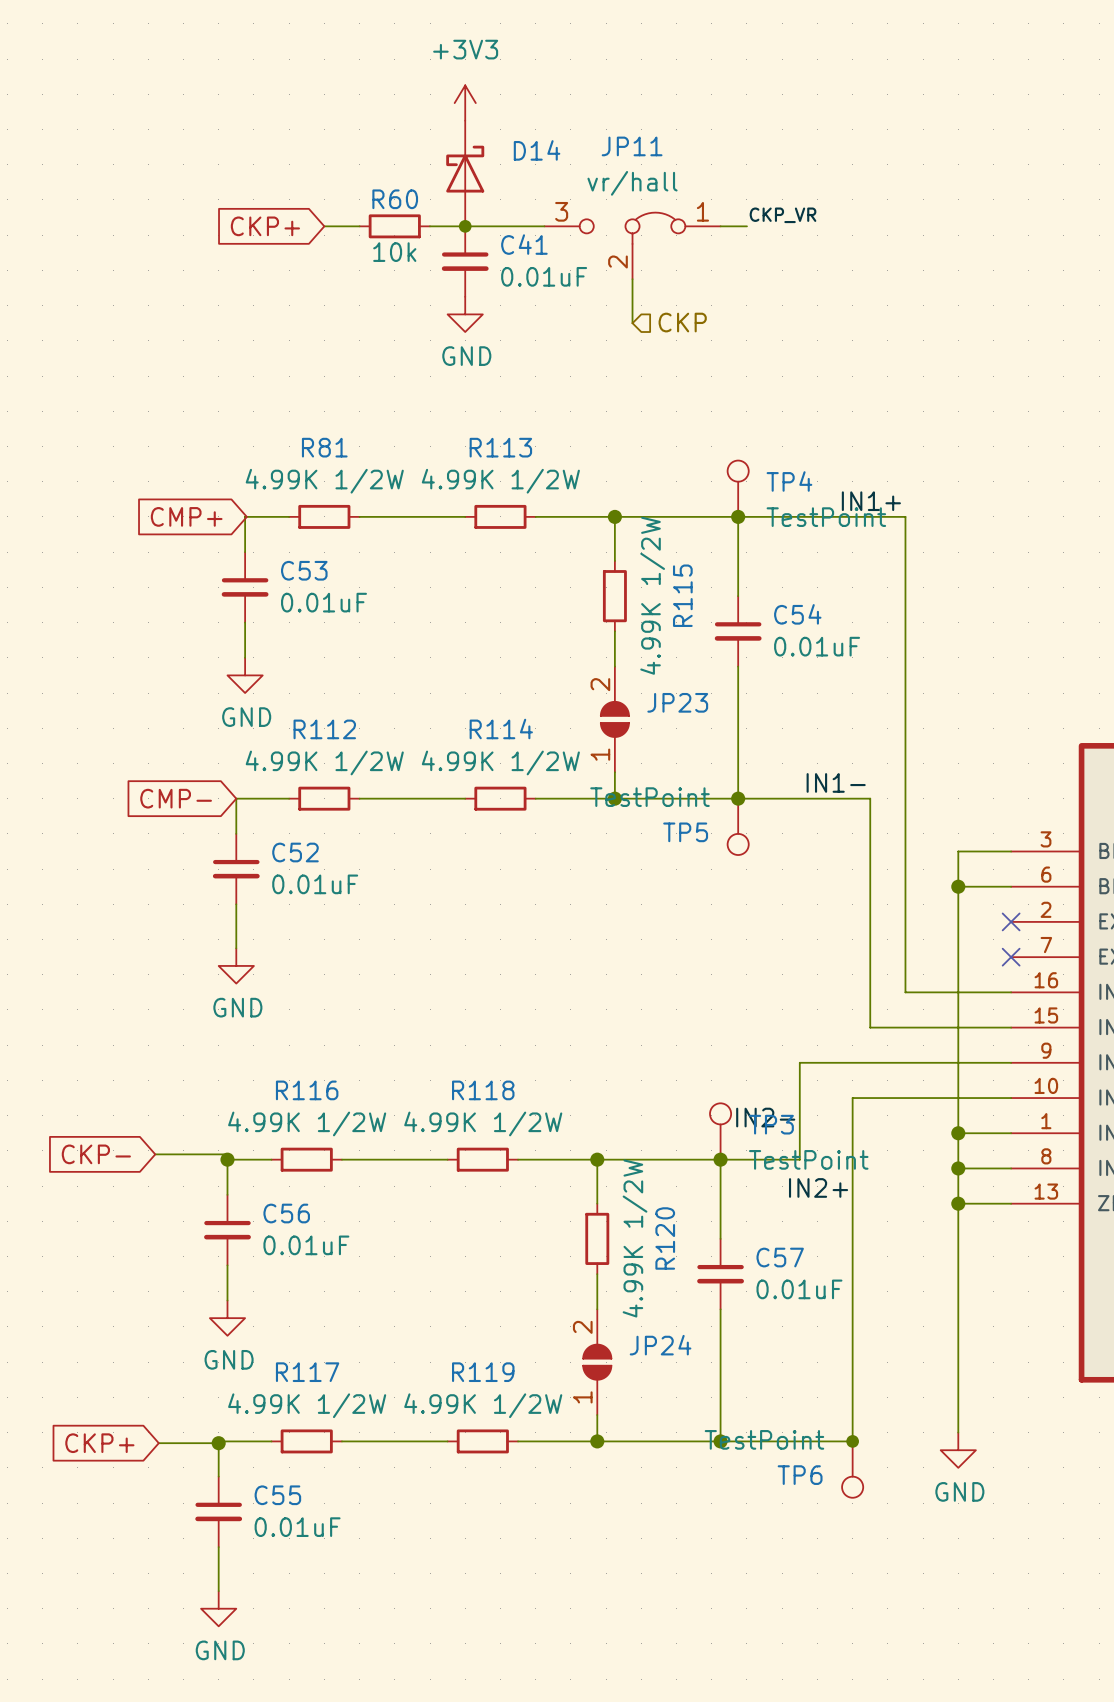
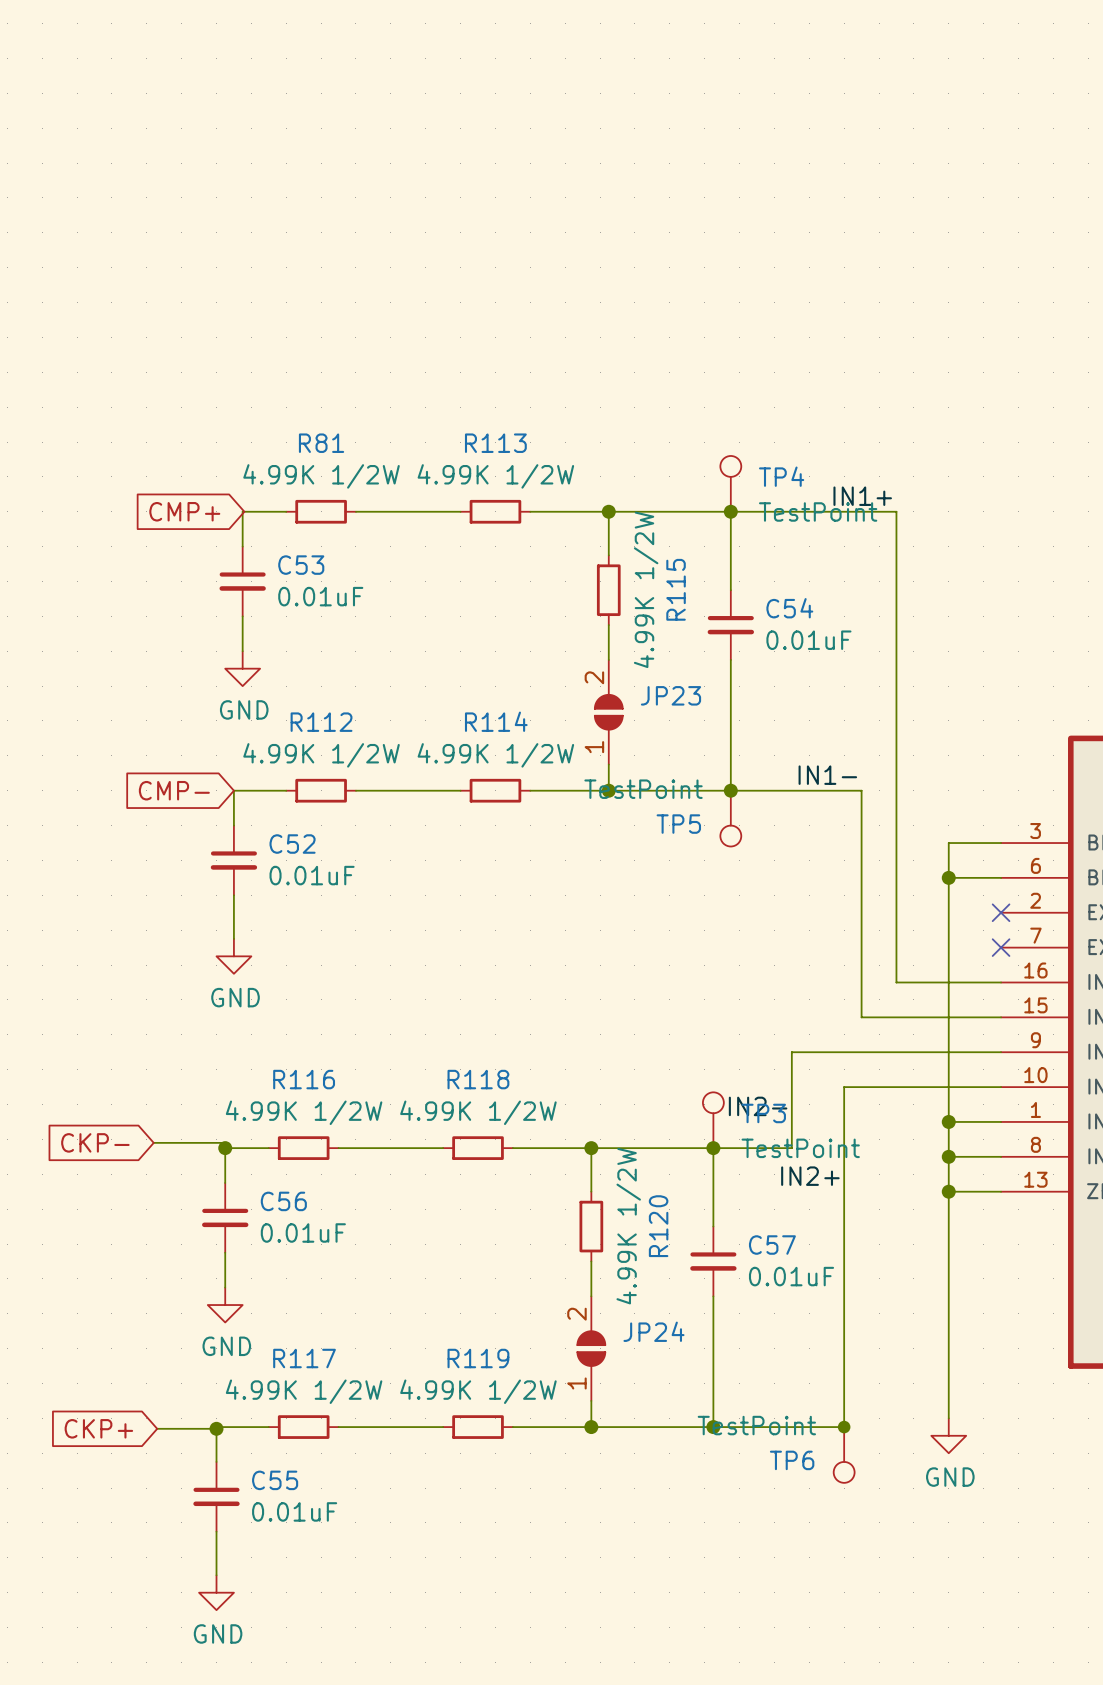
power symbol: +3V3 (465, 103) -> none
D14: (465, 173) -> none
label: CKP_VR (783, 215) -> none
global label: CKP+ (265, 226) -> none
wire: (324, 226) (359, 226) -> none
R60: 10k (394, 226) -> none
wire: (430, 226) (544, 226) -> none
junction: (465, 226) -> none
wire: (720, 226) (746, 226) -> none
JP11: vr/hall (632, 245) -> none
C41: 0.01uF (465, 261) -> none
wire: (632, 279) (632, 323) -> none
power symbol: GND (465, 314) -> none
hierarchical label: CKP (682, 322) -> none

